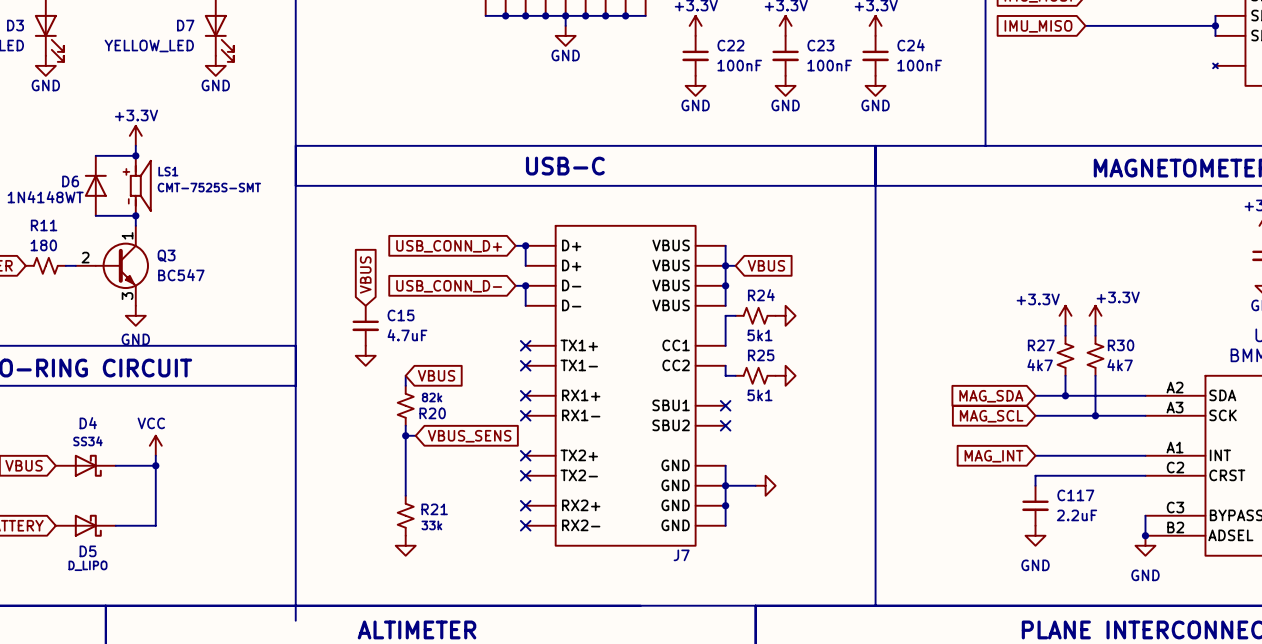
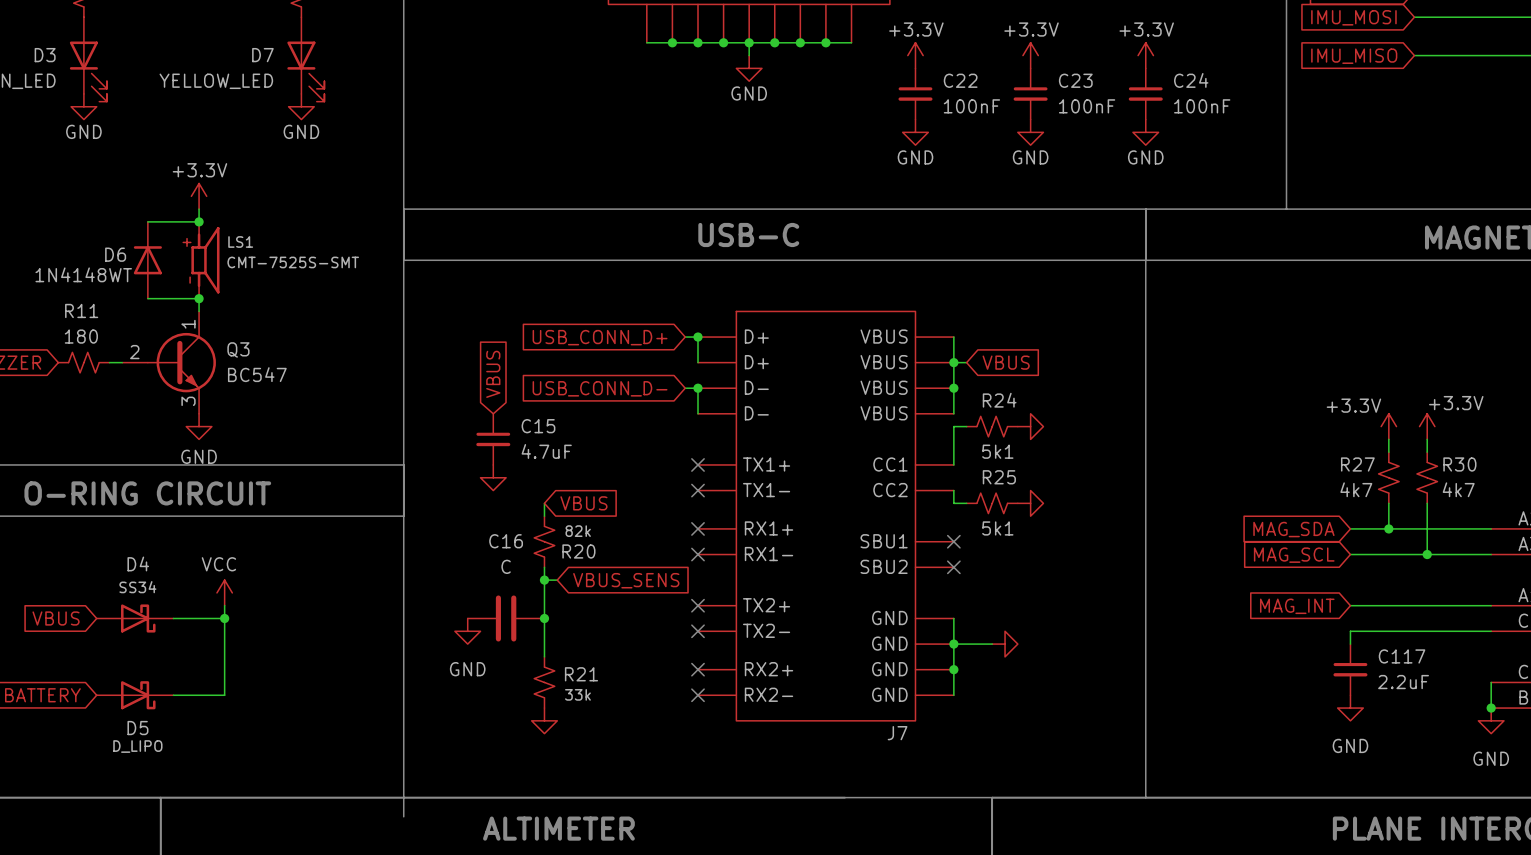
C16: none -> C (506, 618)
junction: none -> (544, 618)
power symbol: none -> GND (467, 631)

